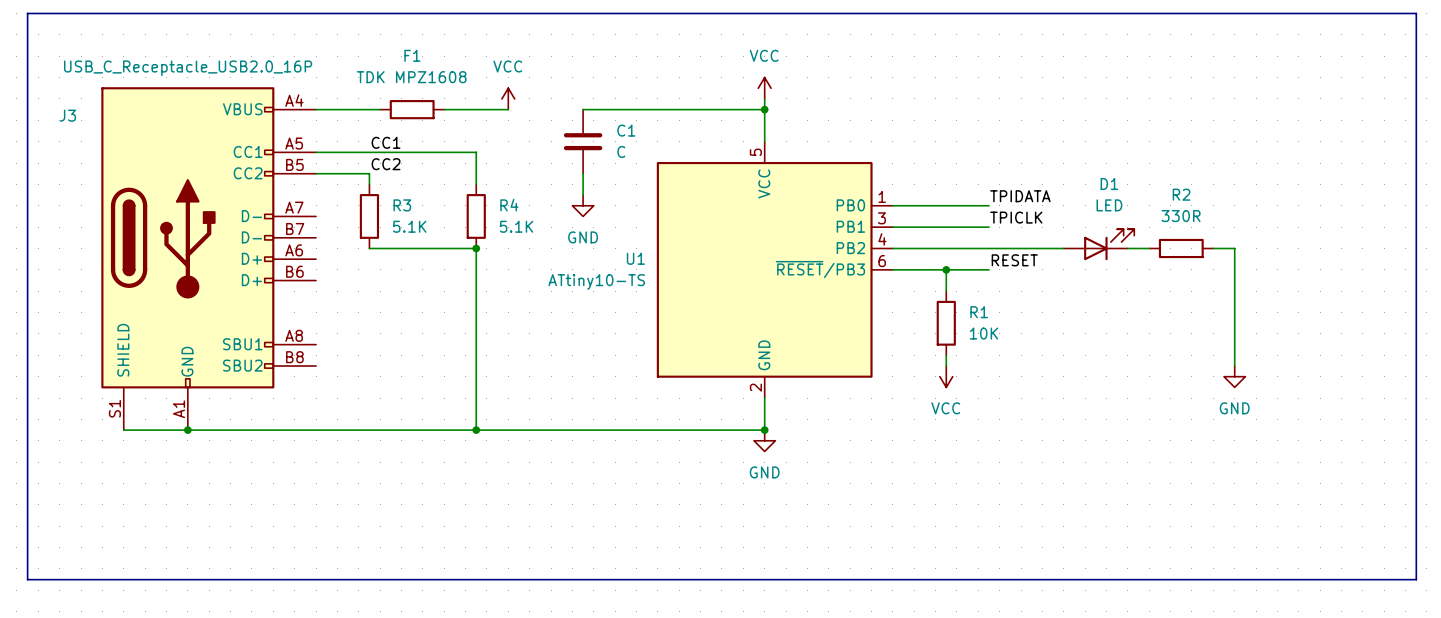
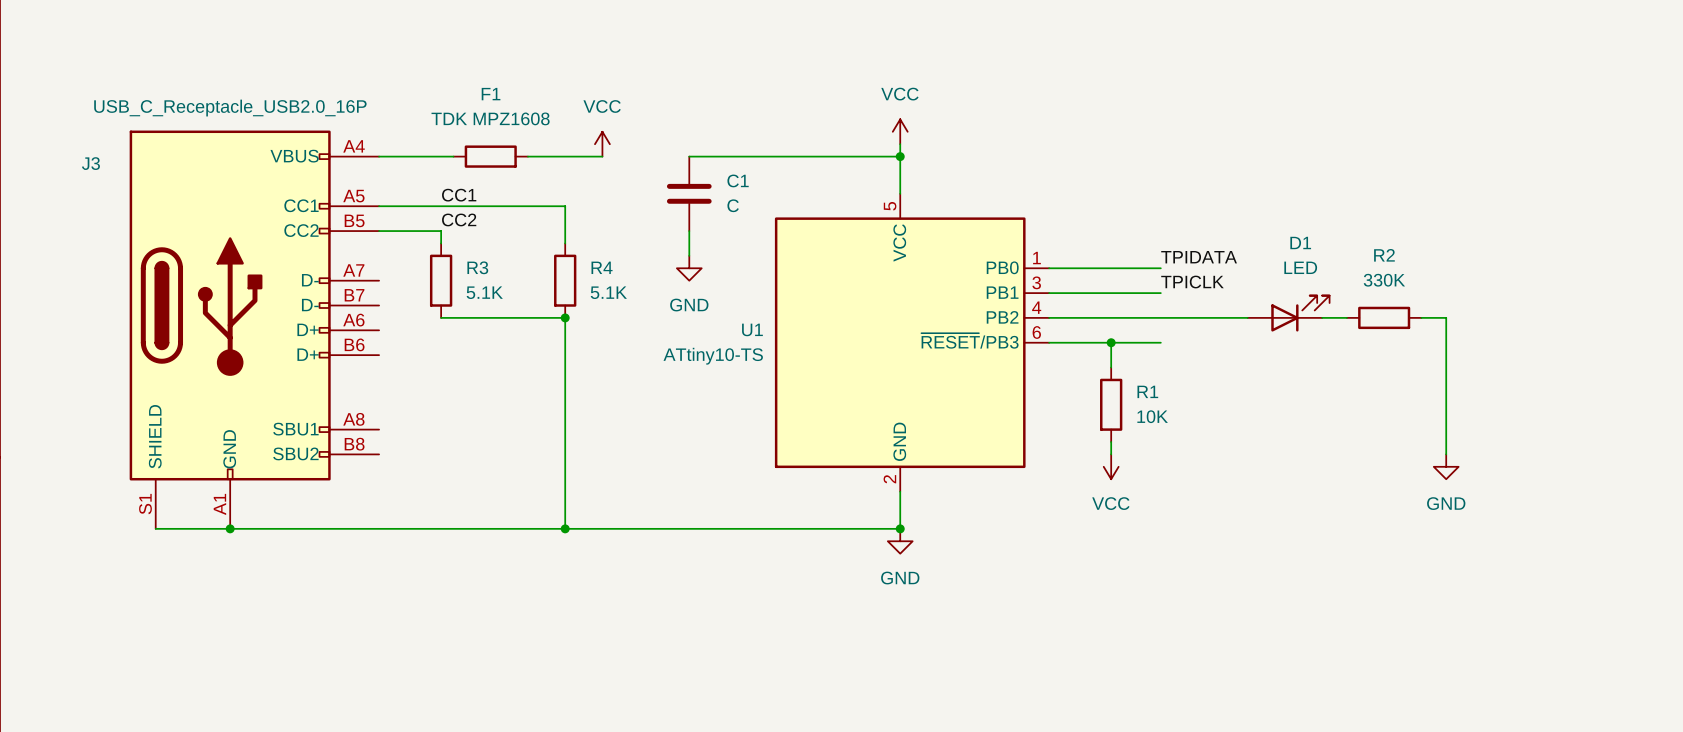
bus: (27, 13) (27, 579) (1416, 579) (1416, 13) (27, 13) -> none
R2 value: 330R (1181, 216) -> 330K (1384, 280)
label: RESET (1014, 260) -> none

